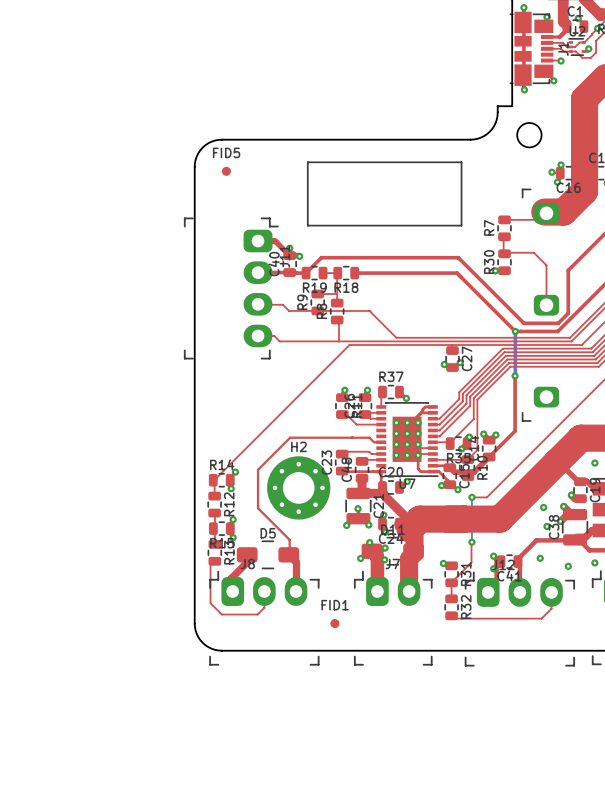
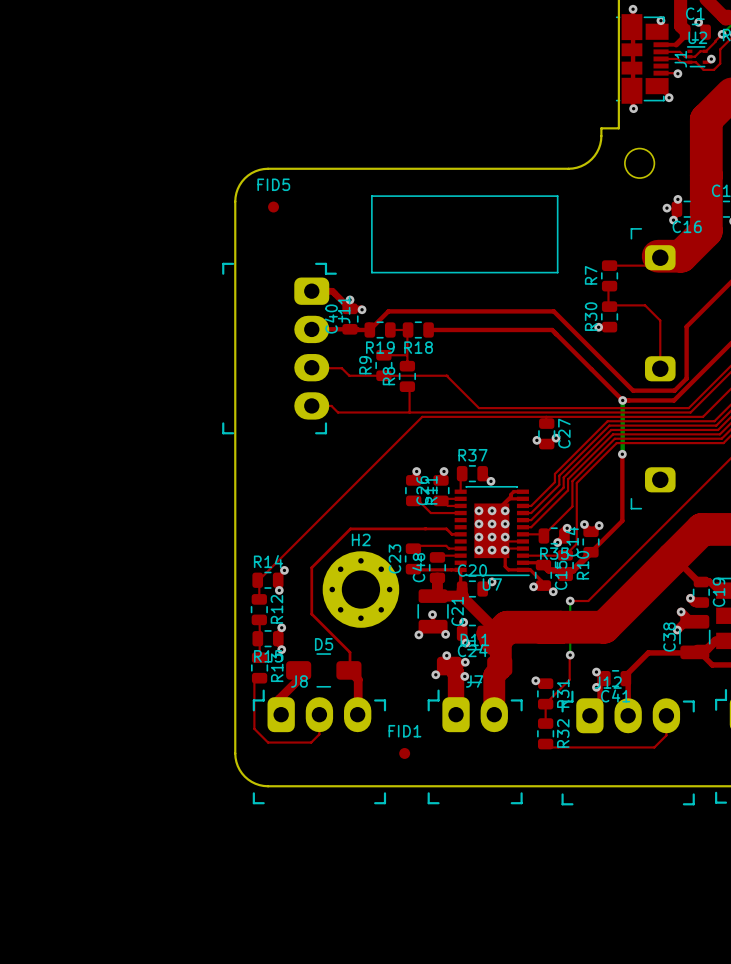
via: (594, 463) -> none
via: (543, 507) -> none
via: (547, 526) -> none
via: (540, 558) -> none
via: (594, 562) -> none
via: (568, 566) -> none

